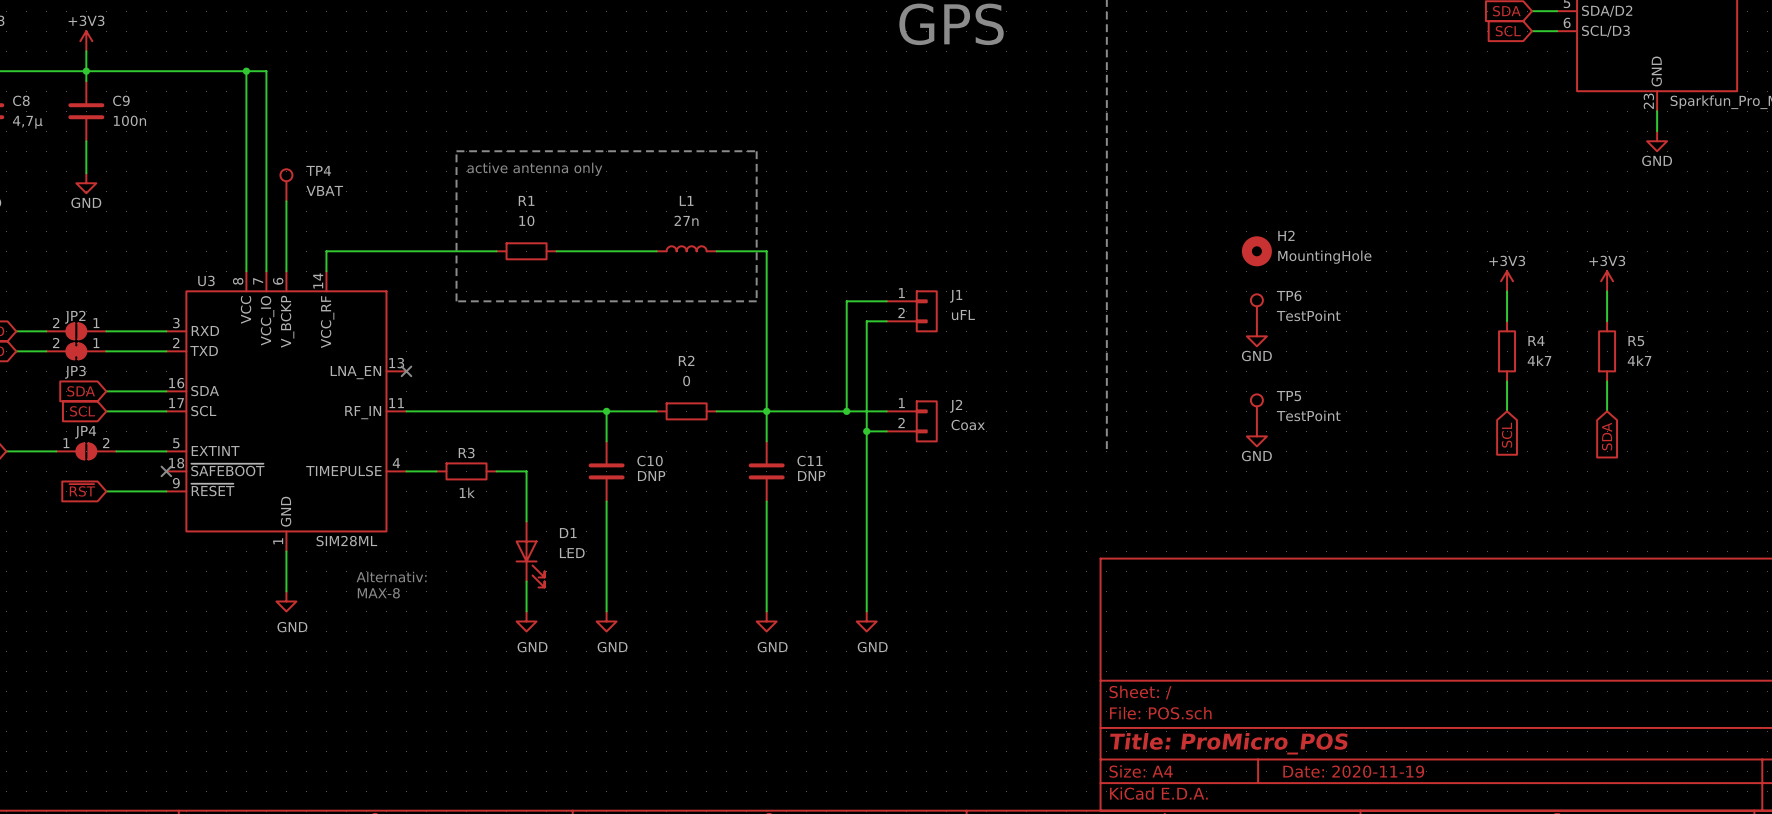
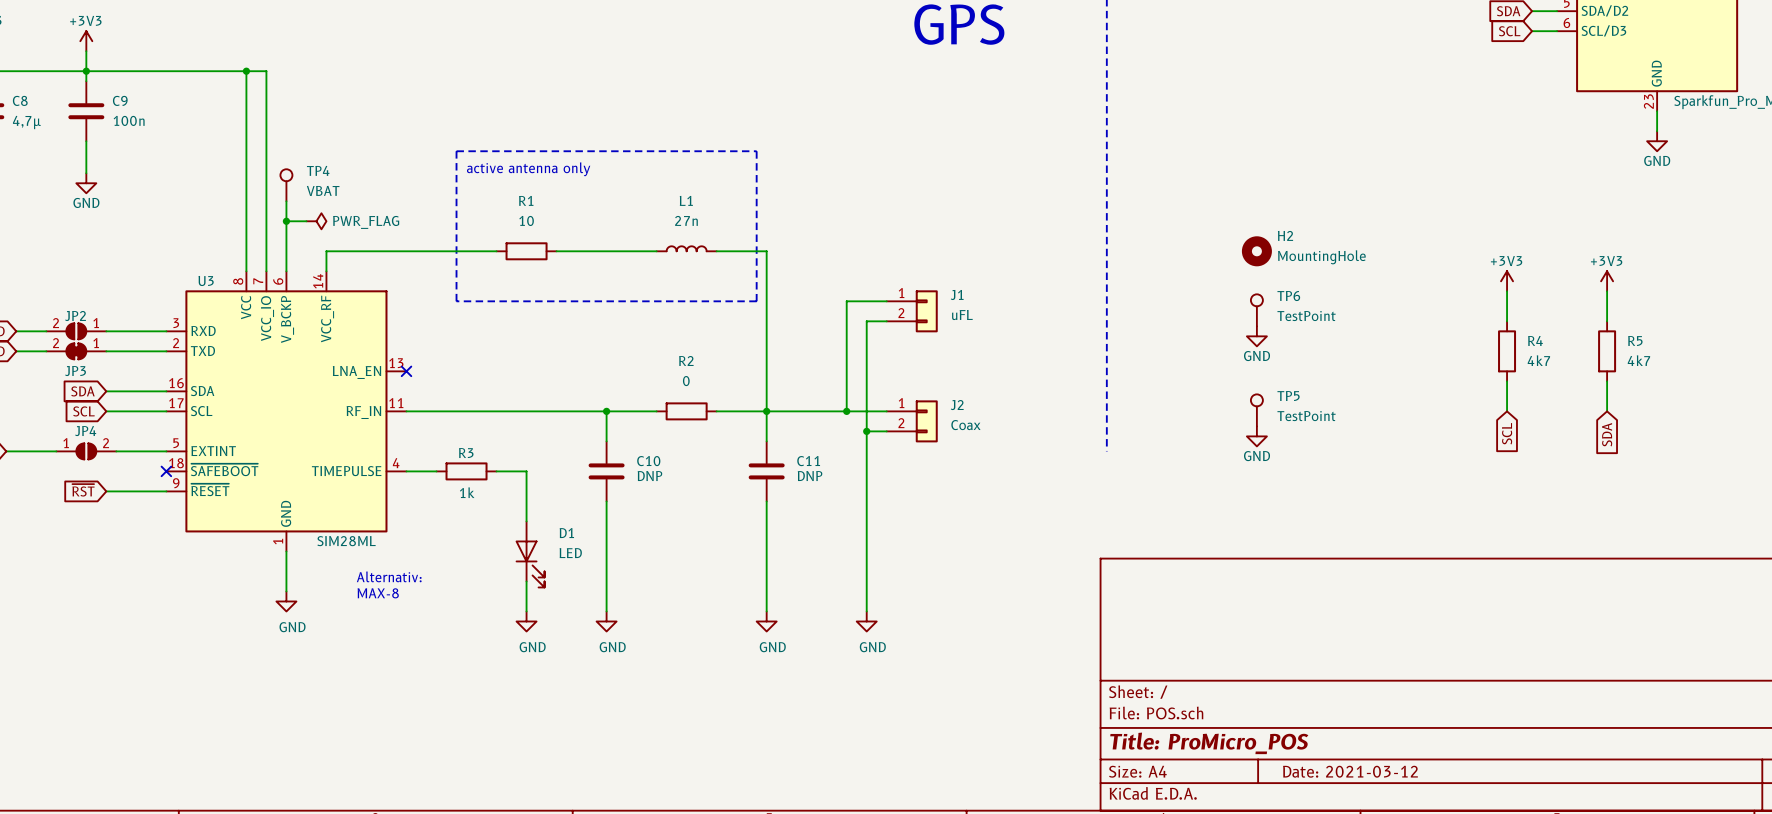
wire: none -> (286, 221) (306, 221)
junction: none -> (286, 221)
power symbol: none -> PWR_FLAG (316, 221)
title block: Date: 2020-11-19 (1353, 771) -> Date: 2021-03-12 (1350, 771)

